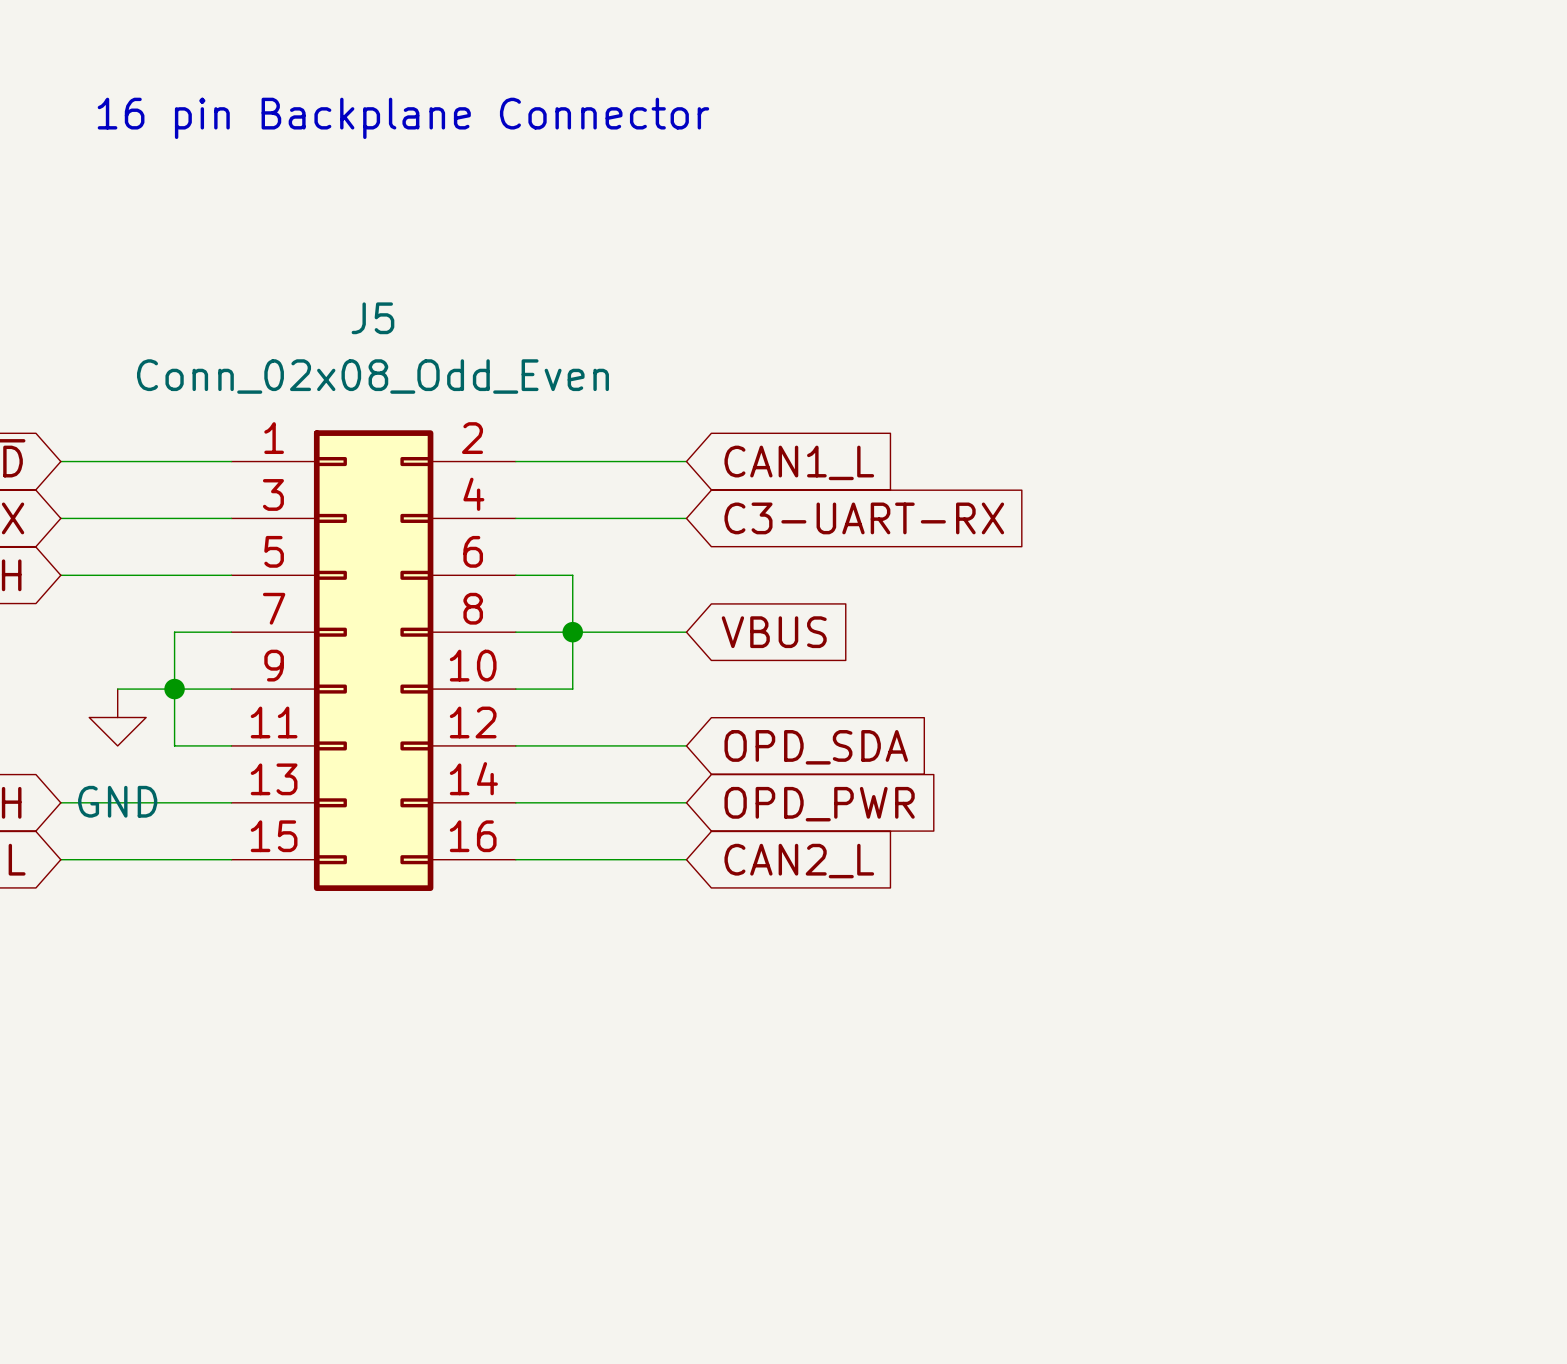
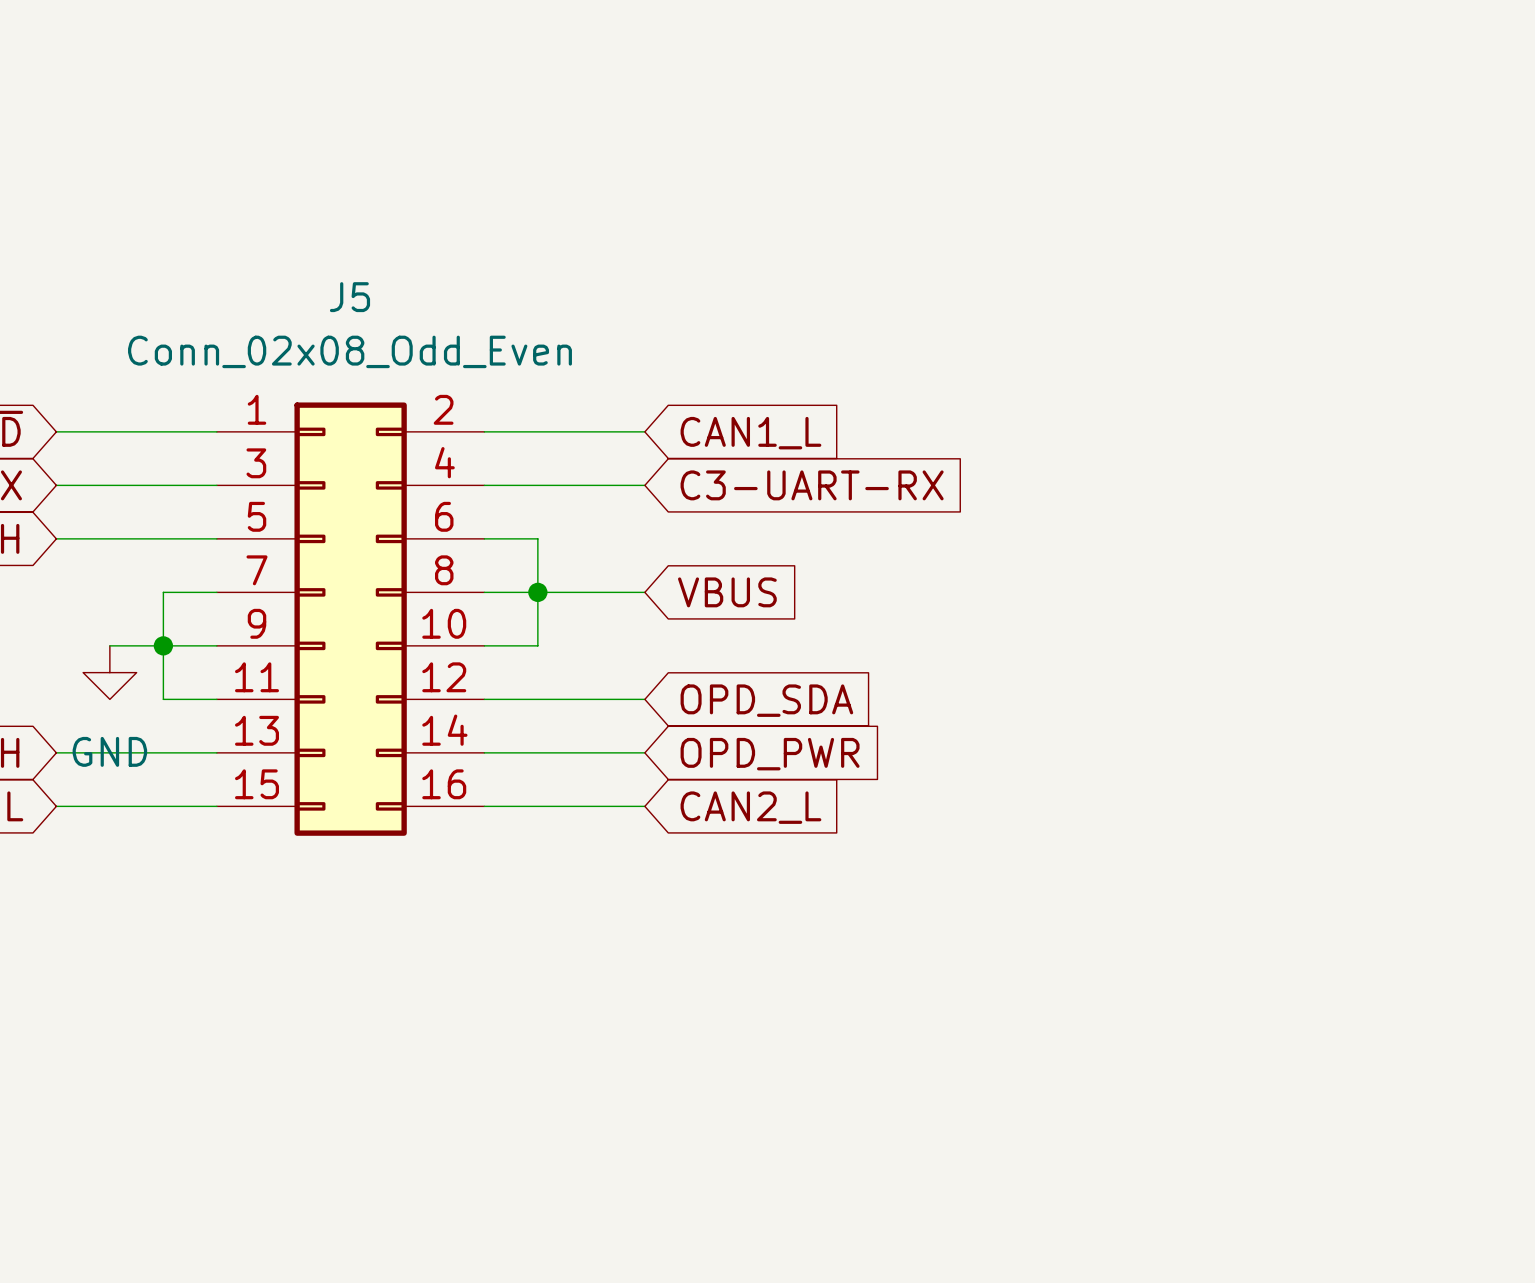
text: 16 pin Backplane Connector (403, 118) -> none

